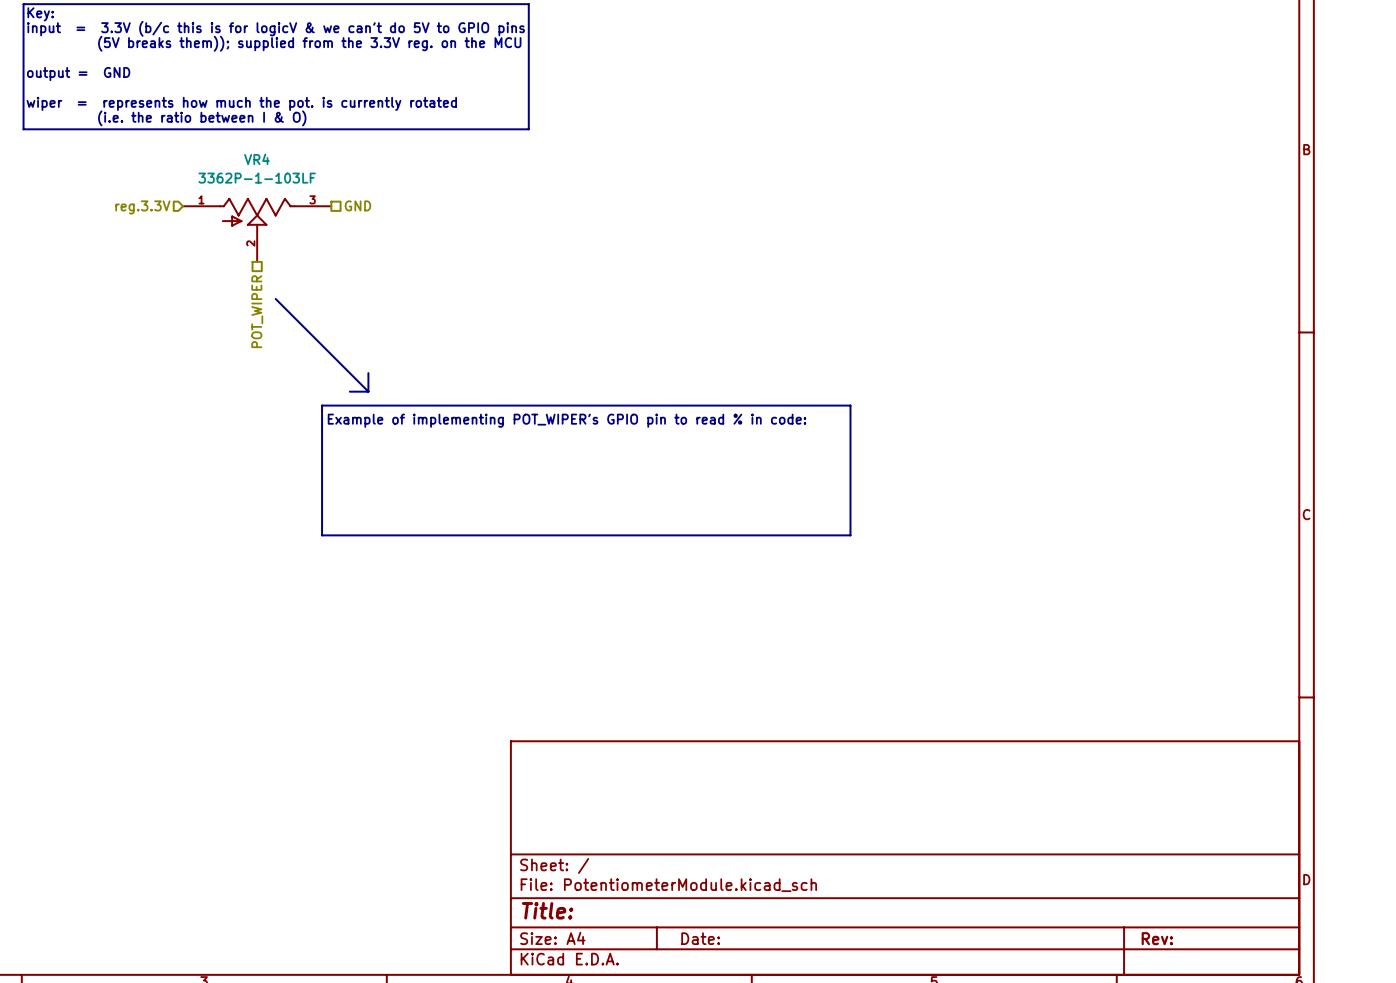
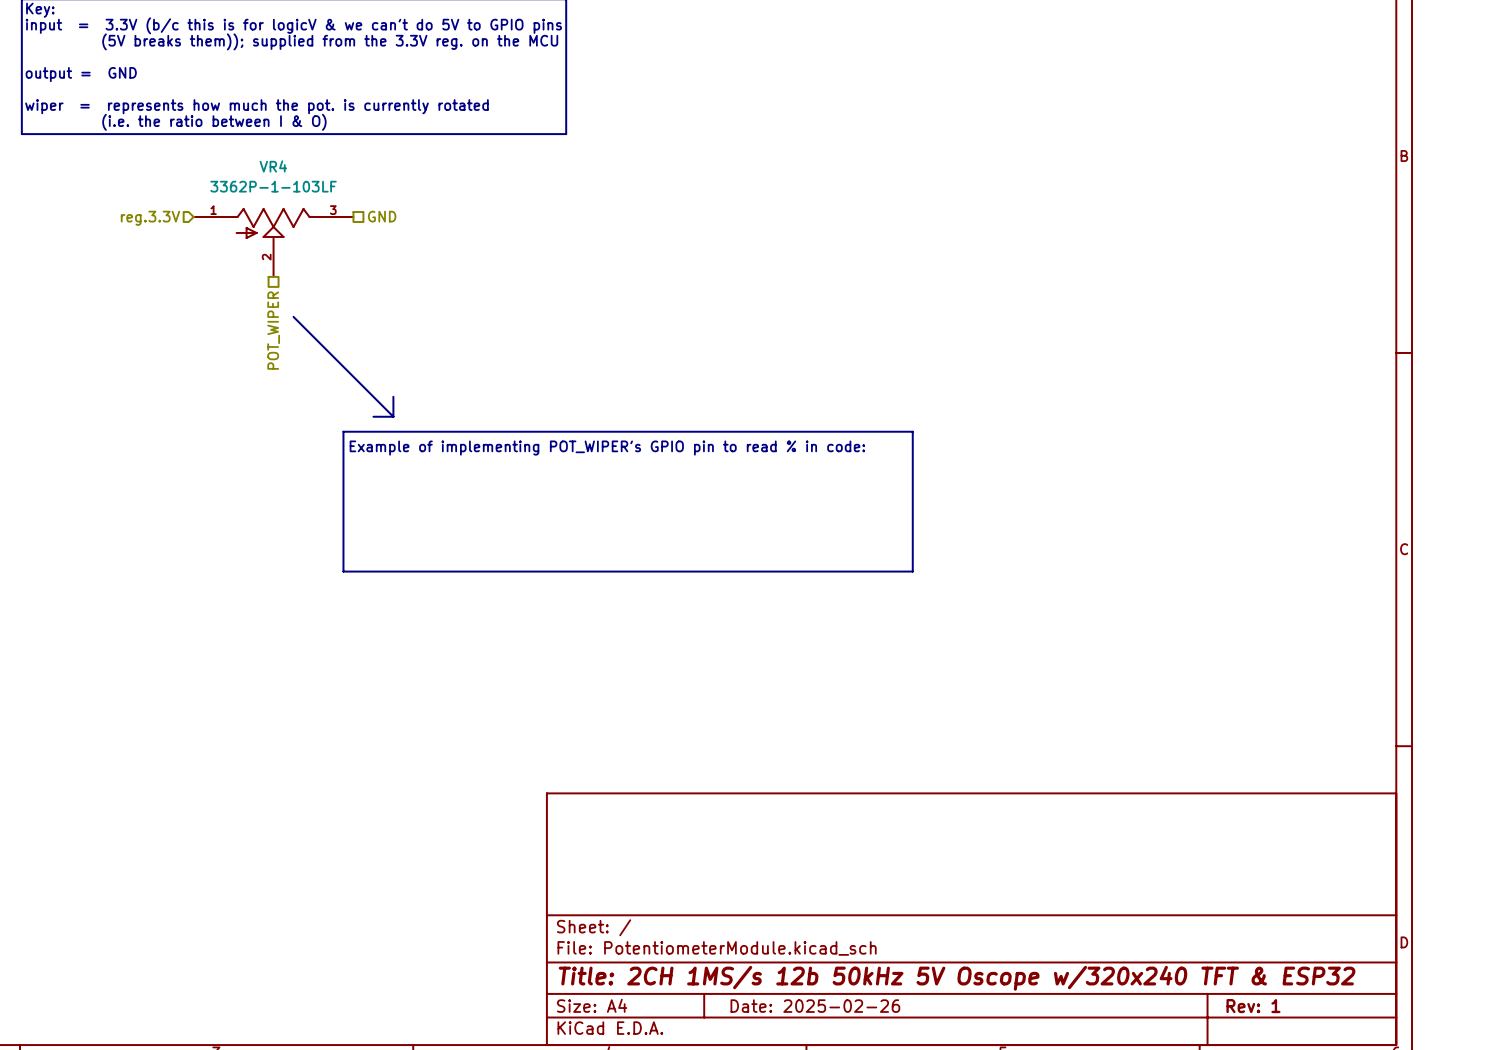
title block: Title: (547, 910) -> Title: 2CH 1MS/s 12b 50kHz 5V Oscope w/320x240 TFT & ESP32 (957, 978)
title block: Date: (700, 938) -> Date: 2025-02-26 (815, 1006)
title block: Rev: (1157, 938) -> Rev: 1 (1253, 1006)

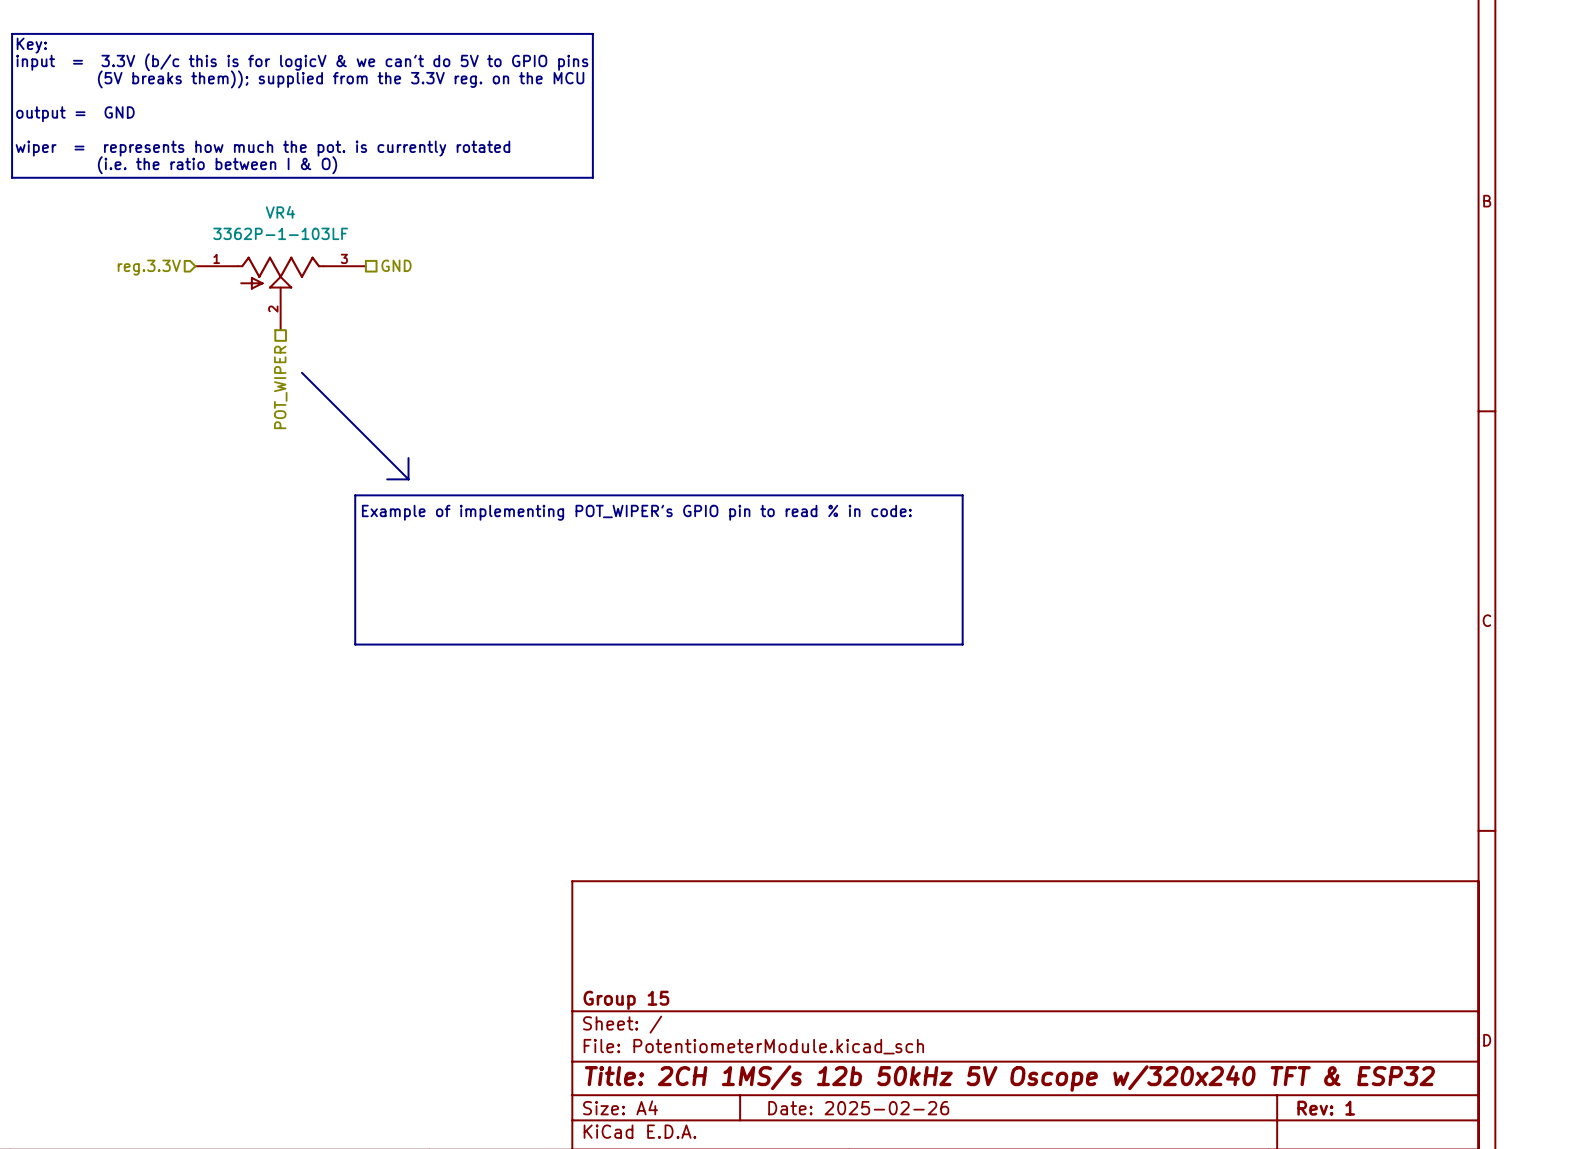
title block: none -> Group 15 (626, 1000)

